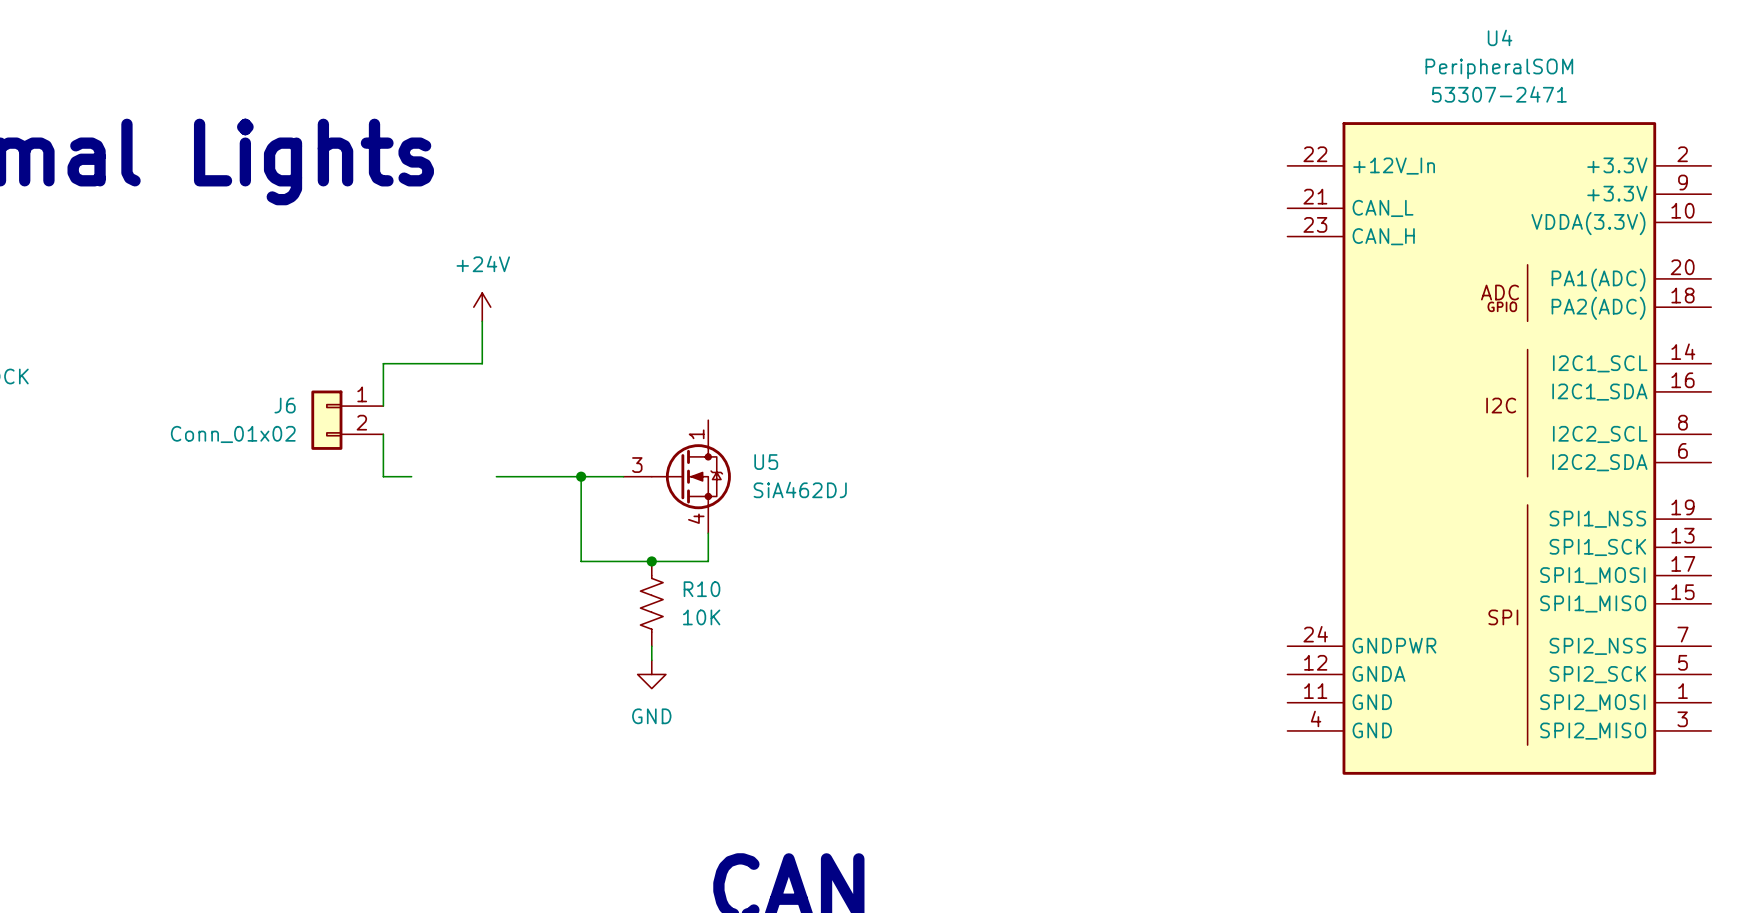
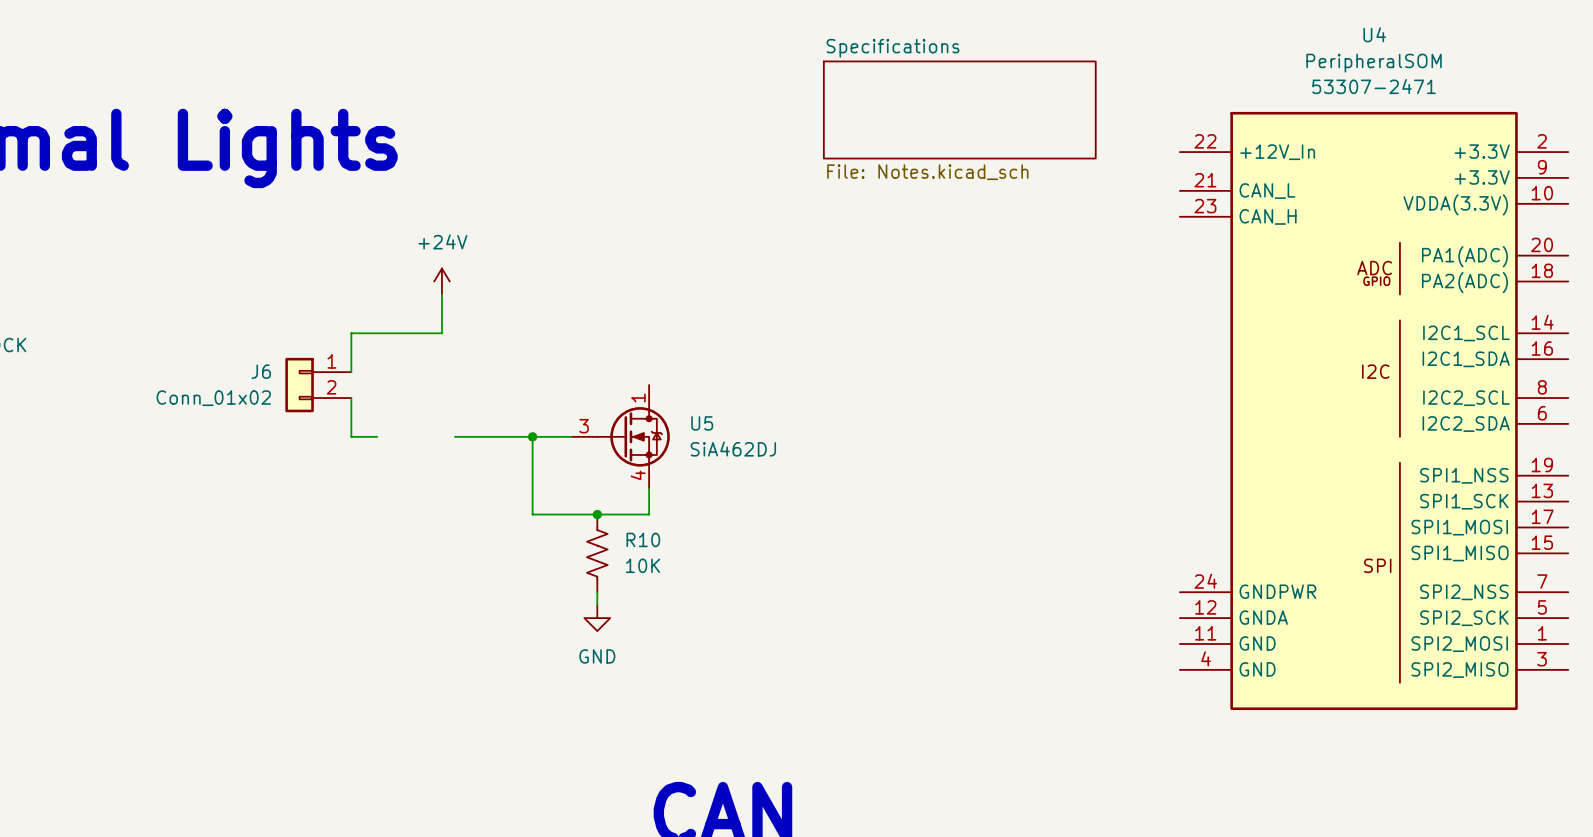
sheet Specifications: none -> File: Notes.kicad_sch (959, 109)

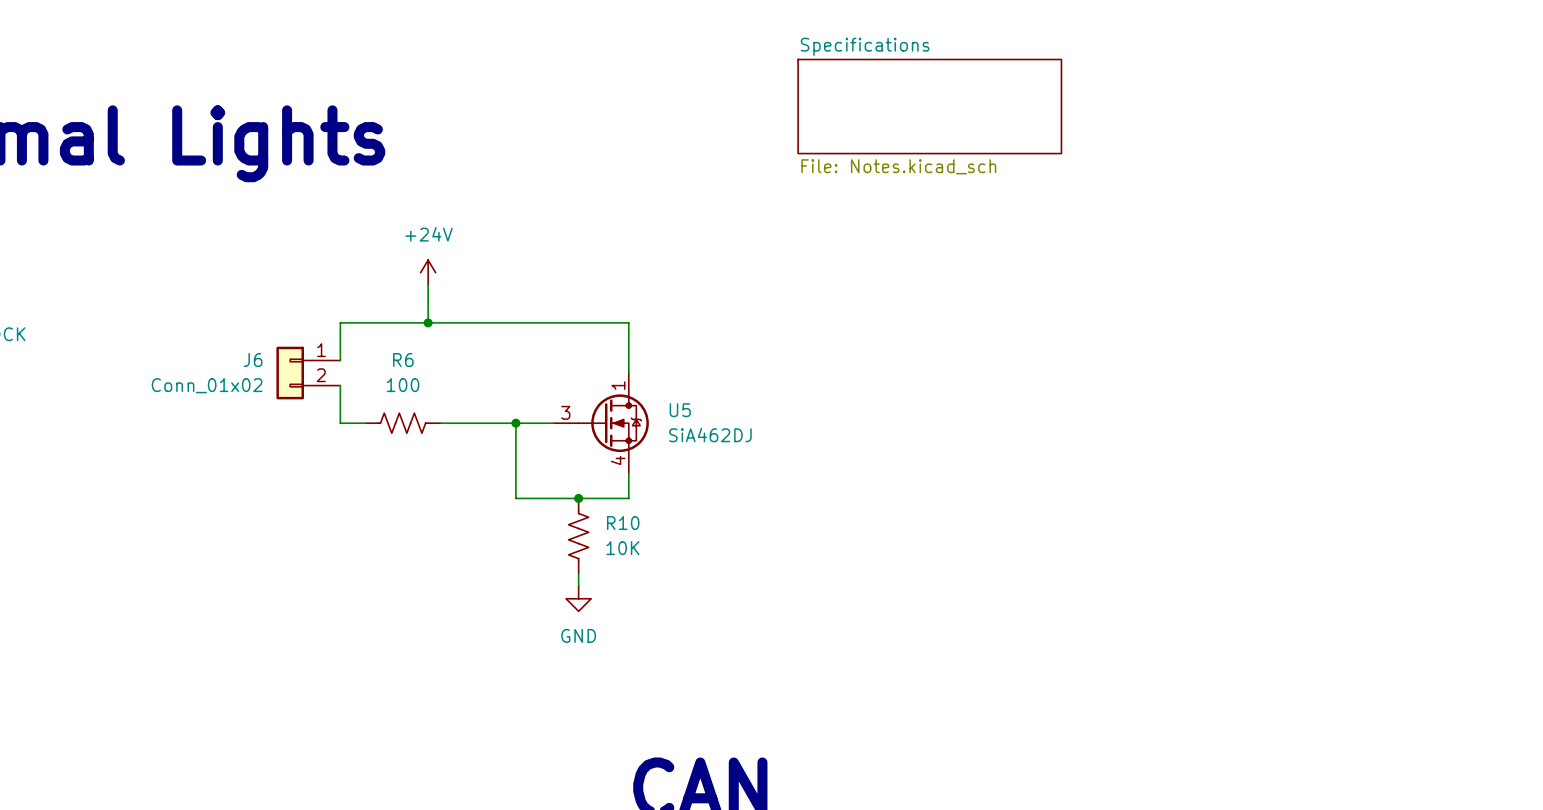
wire: none -> (428, 322) (628, 322) (628, 373)
junction: none -> (428, 322)
U4: PeripheralSOM (1374, 410) -> none
R6: none -> 100 (403, 423)

